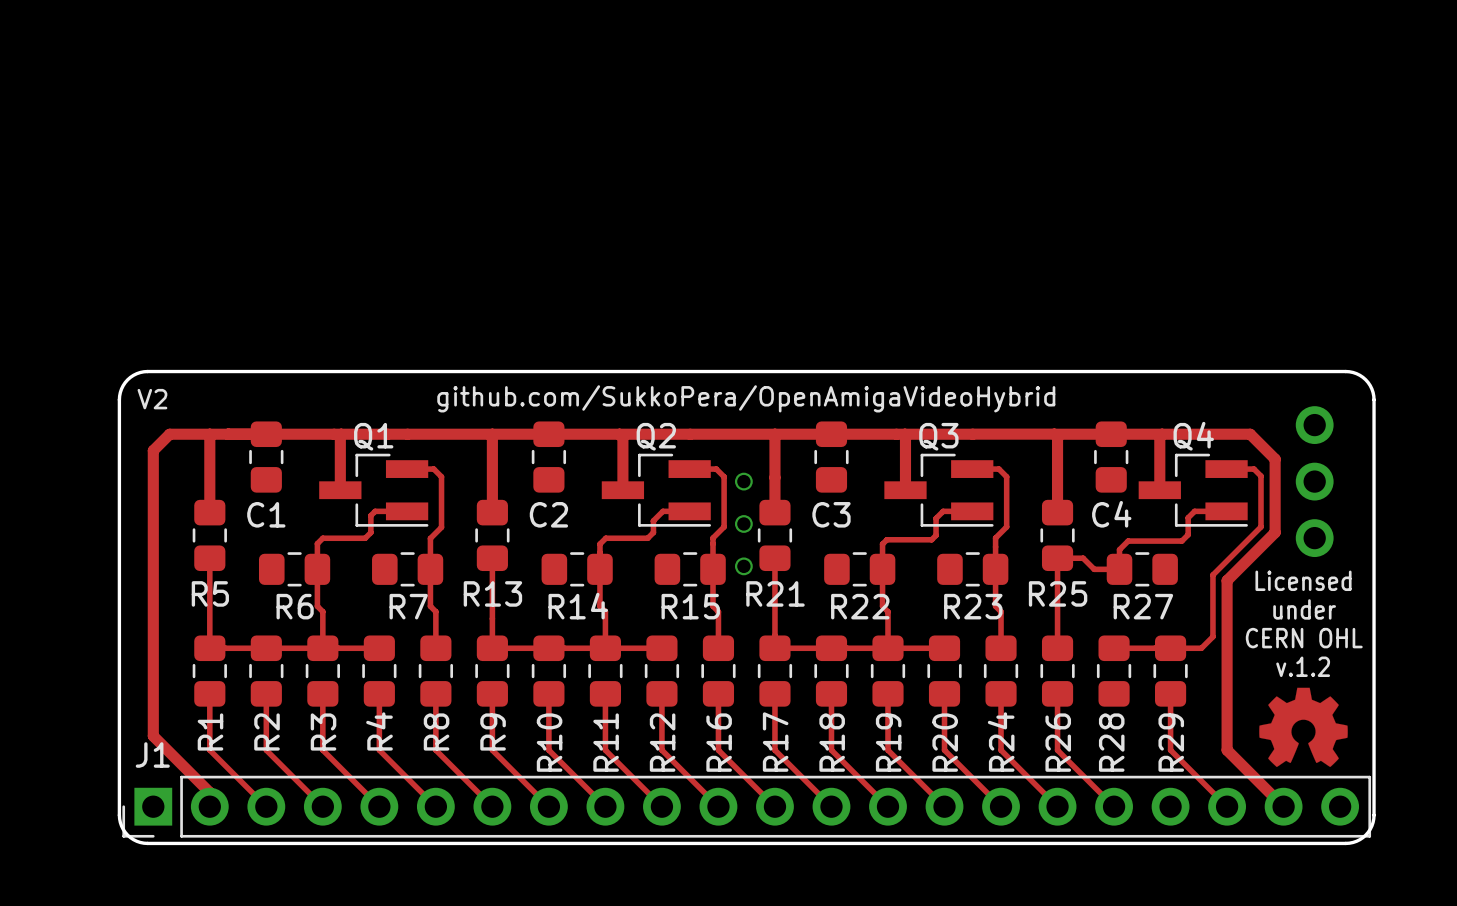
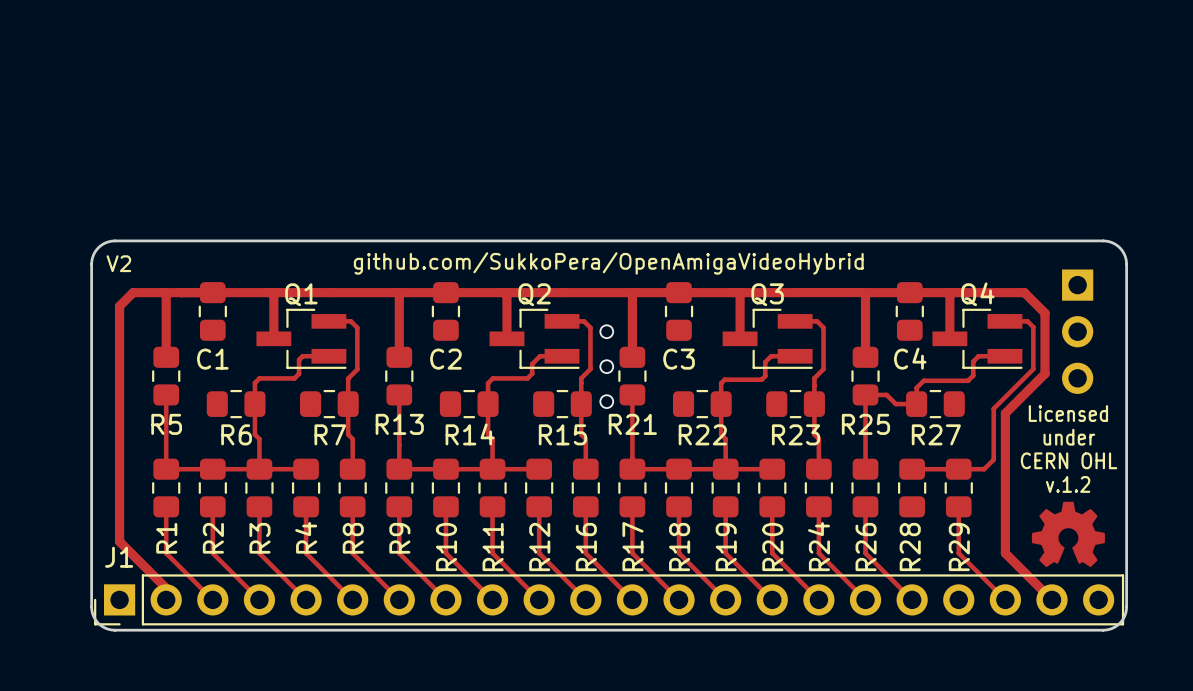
part footprint: [1295, 406, 1334, 558] -> [1062, 269, 1094, 394]

